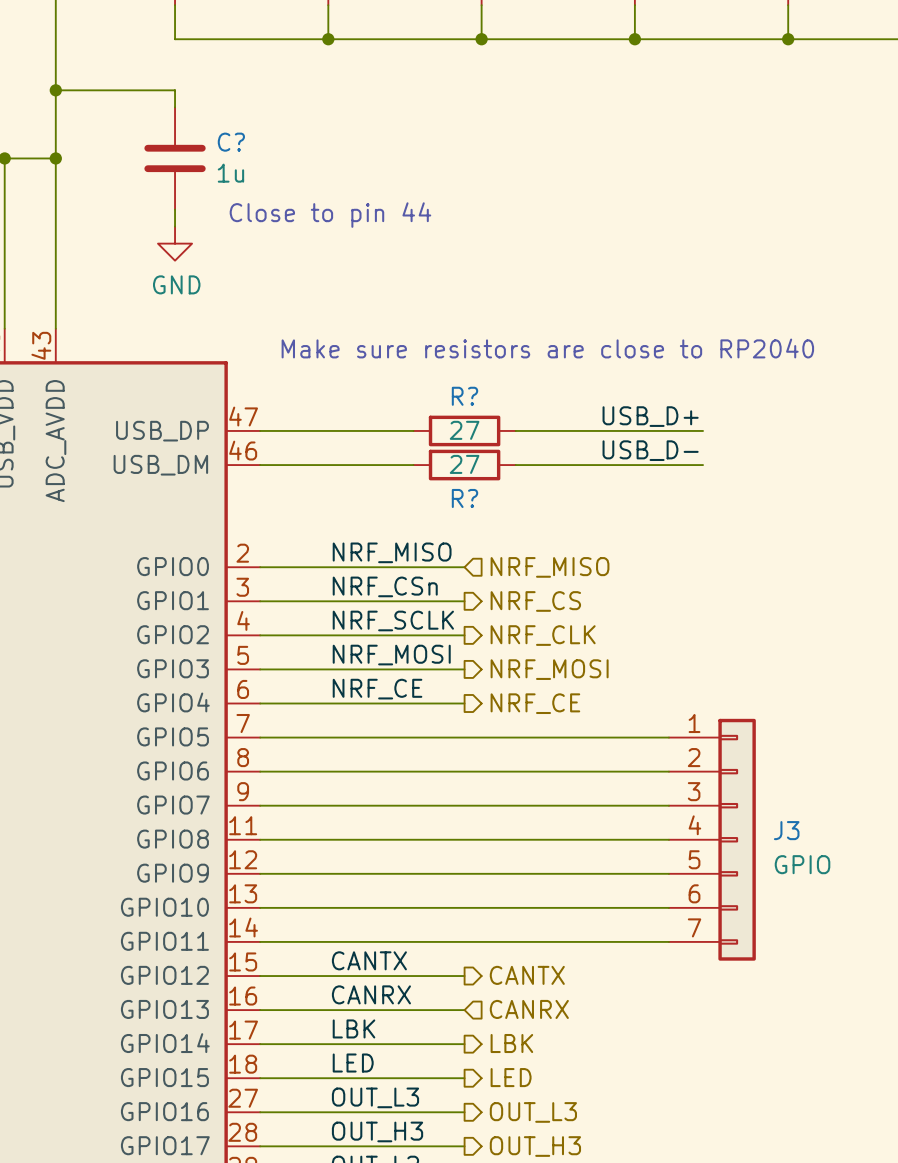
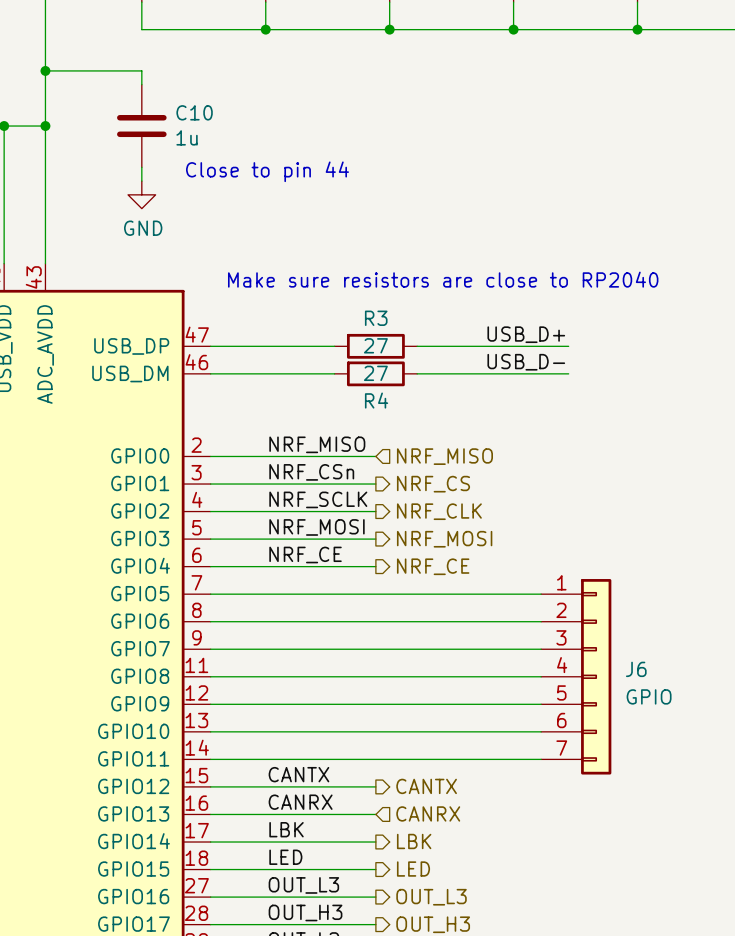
C? name: C? (231, 142) -> C10 (194, 112)
R? name: R? (464, 396) -> R3 (376, 318)
R? name: R? (464, 498) -> R4 (376, 400)
J3 name: J3 (786, 830) -> J6 (636, 669)

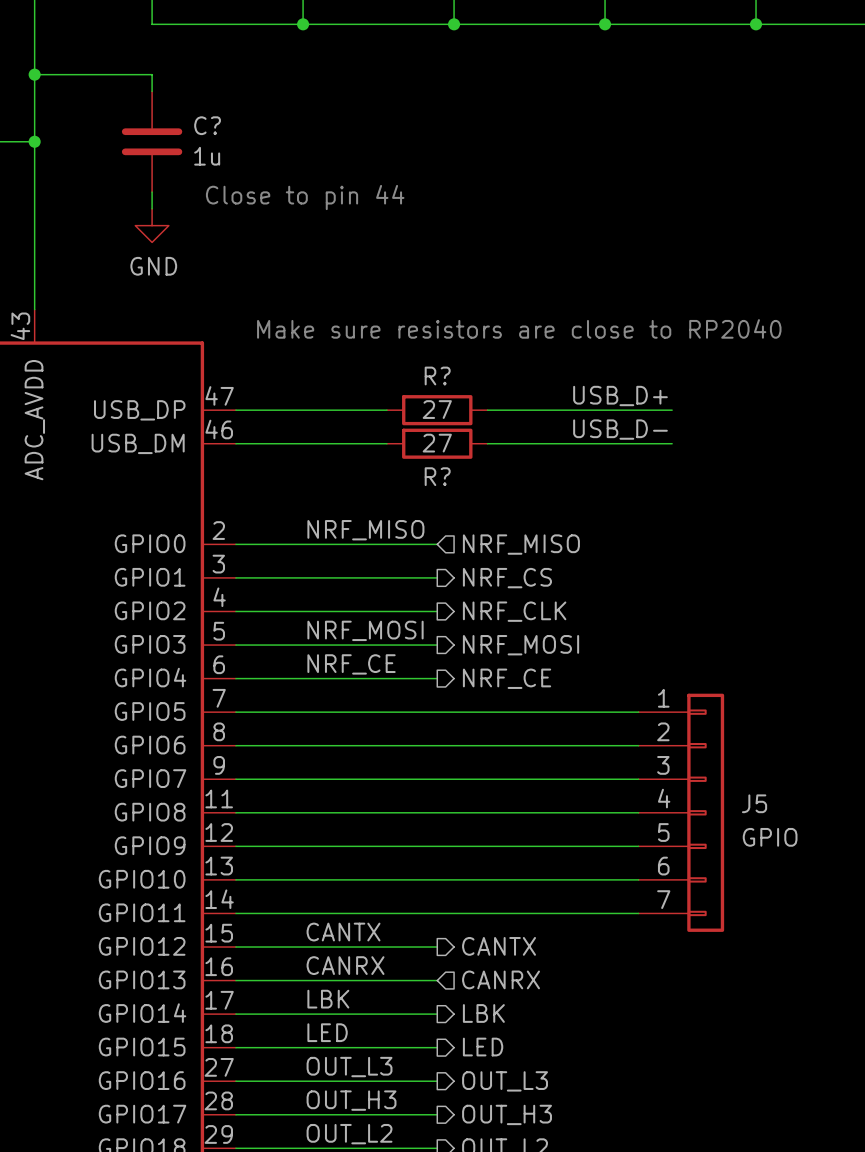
C10 name: C10 (194, 112) -> C? (207, 125)
R3 name: R3 (376, 318) -> R? (437, 376)
R4 name: R4 (376, 400) -> R? (437, 476)
label: NRF_CSn (311, 472) -> none
label: NRF_SCLK (318, 499) -> none
J6 name: J6 (636, 669) -> J5 (754, 803)

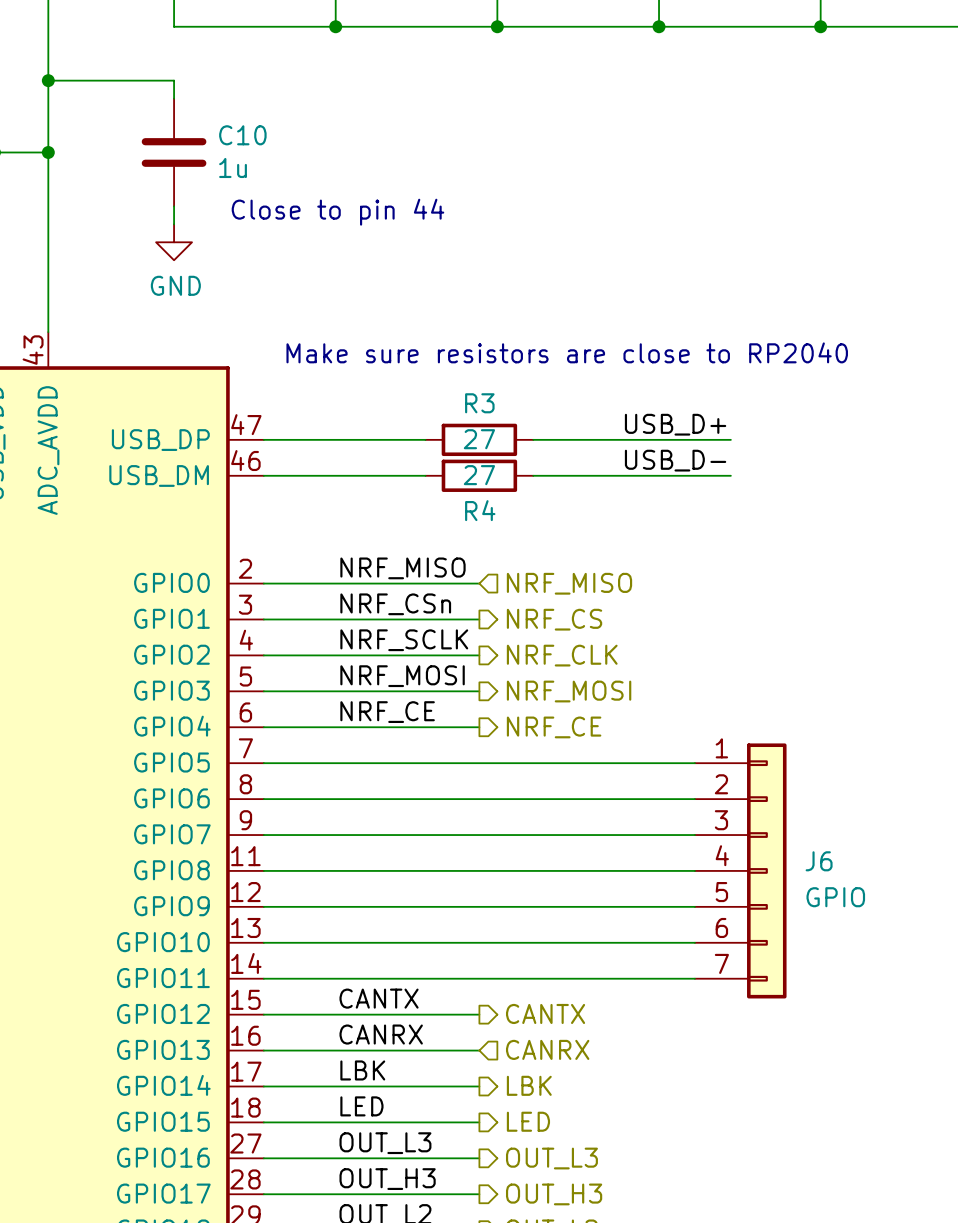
C? name: C? (207, 125) -> C10 (242, 135)
R? name: R? (437, 376) -> R3 (479, 403)
R? name: R? (437, 476) -> R4 (480, 510)
label: none -> NRF_CSn (395, 604)
label: none -> NRF_SCLK (404, 640)
J5 name: J5 (754, 803) -> J6 (819, 861)

